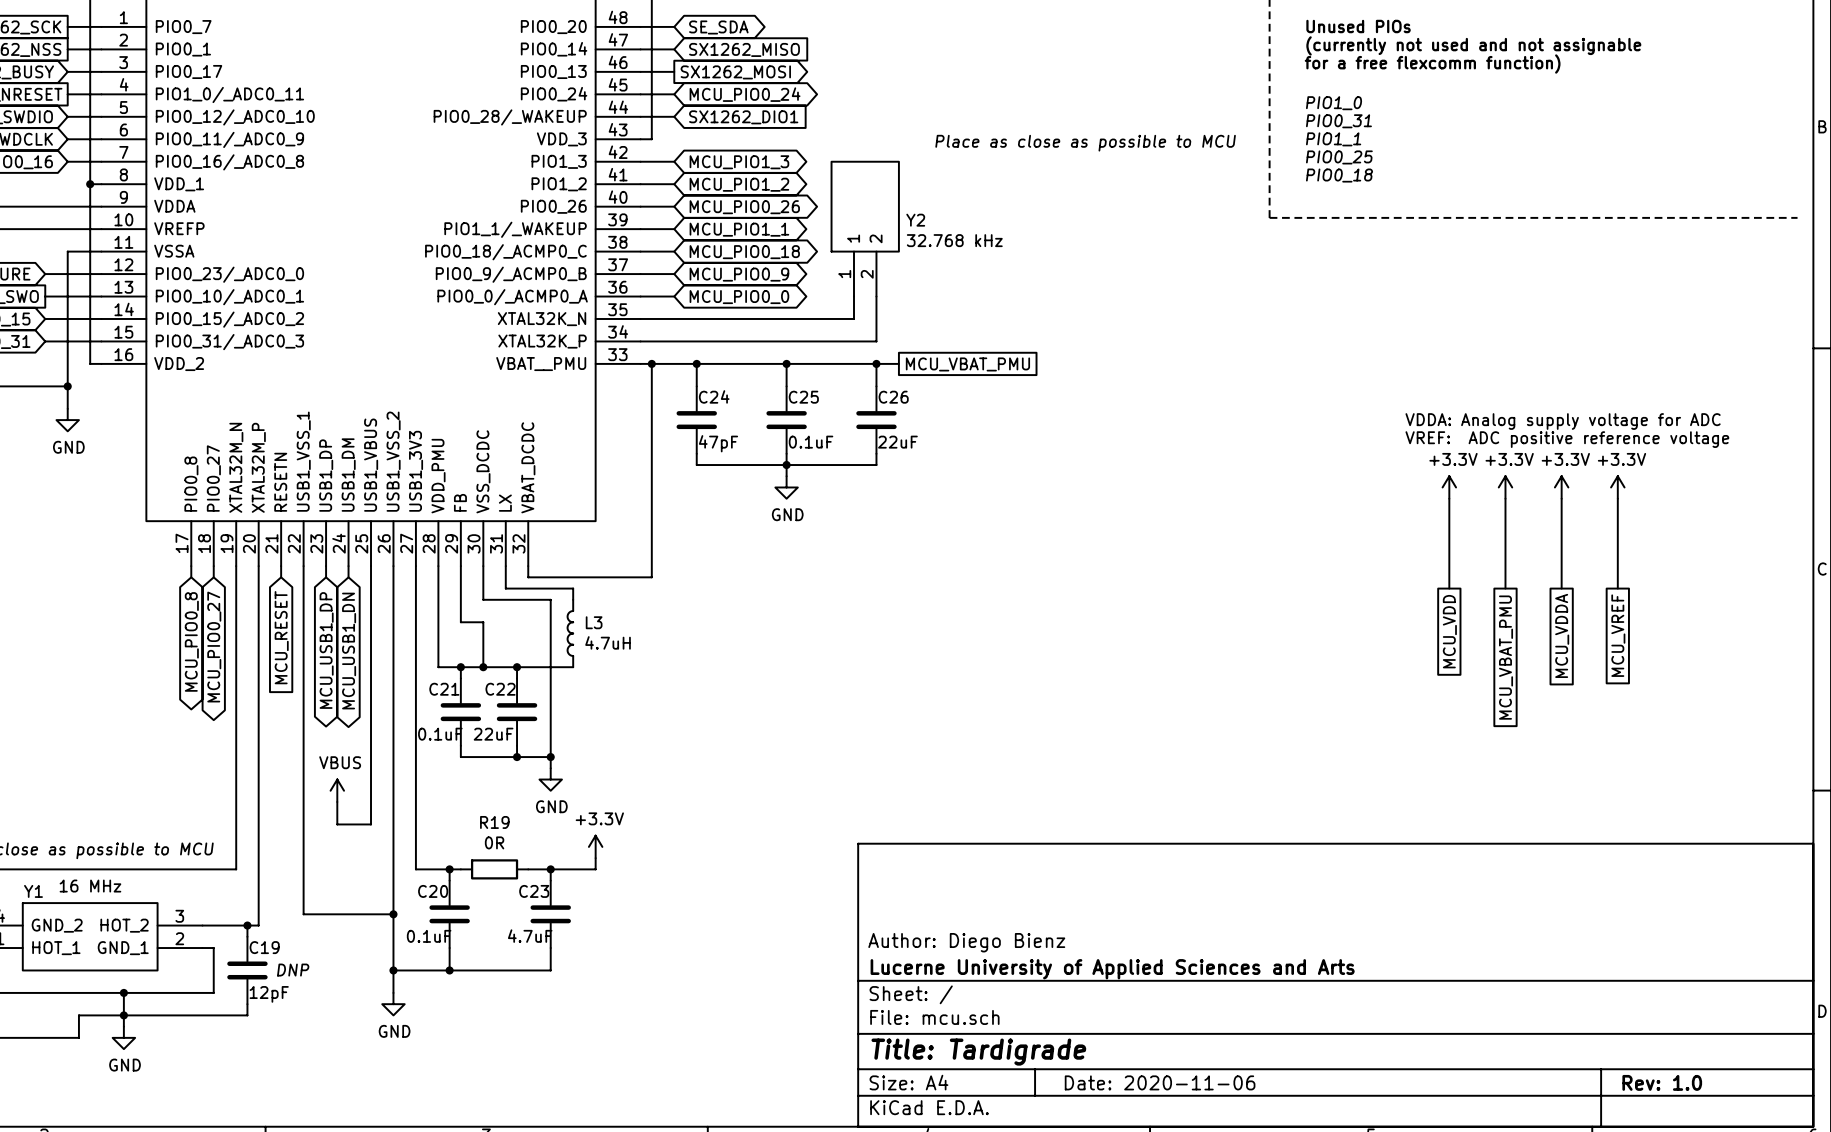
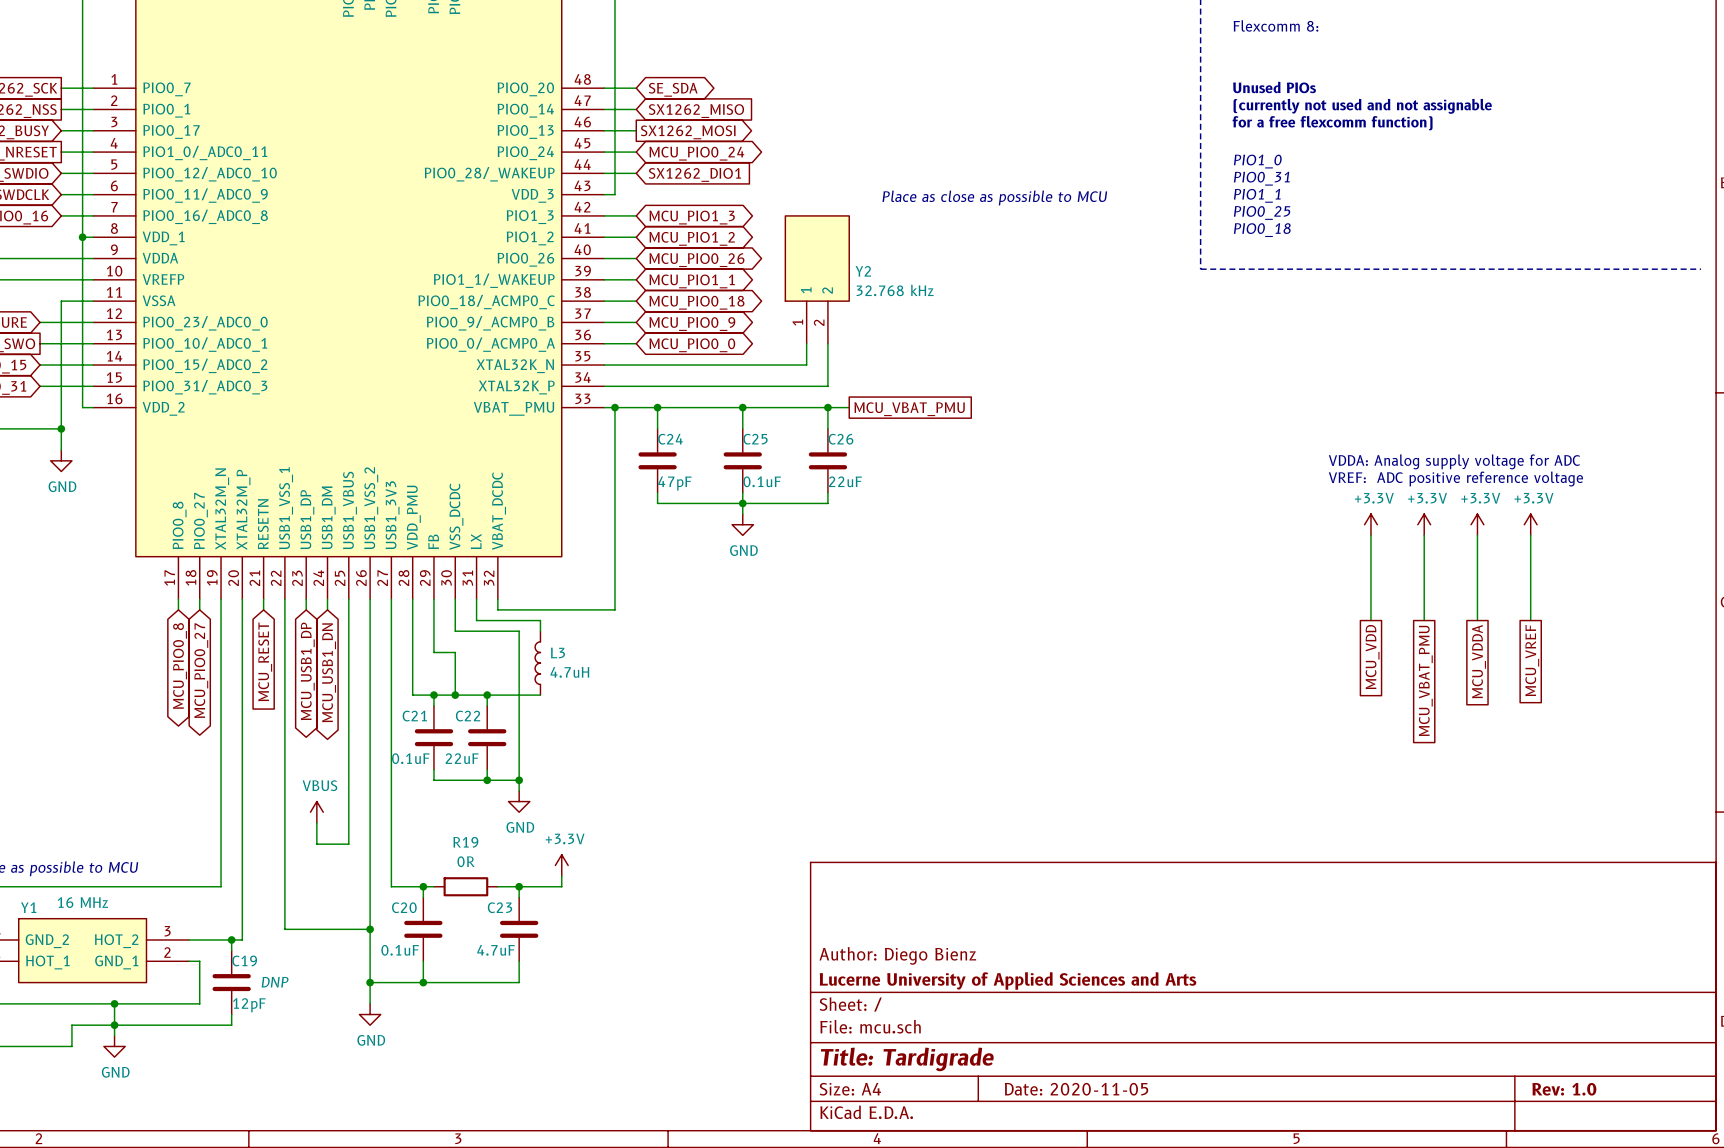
title block: Date: 2020-11-06 (1160, 1082) -> Date: 2020-11-05 (1076, 1089)

